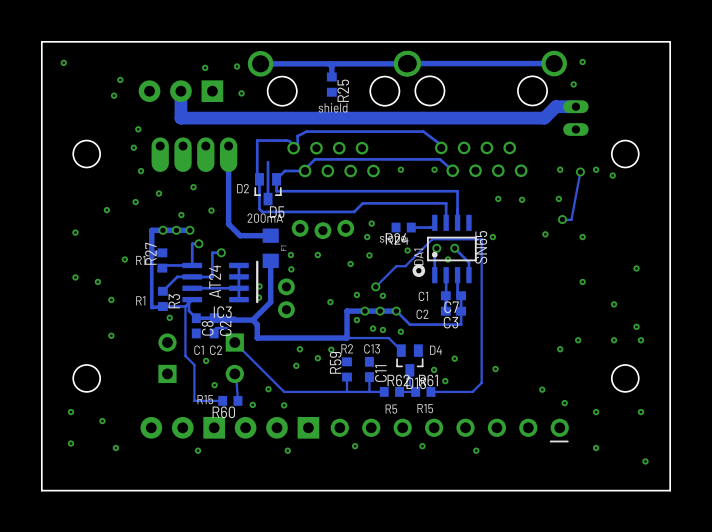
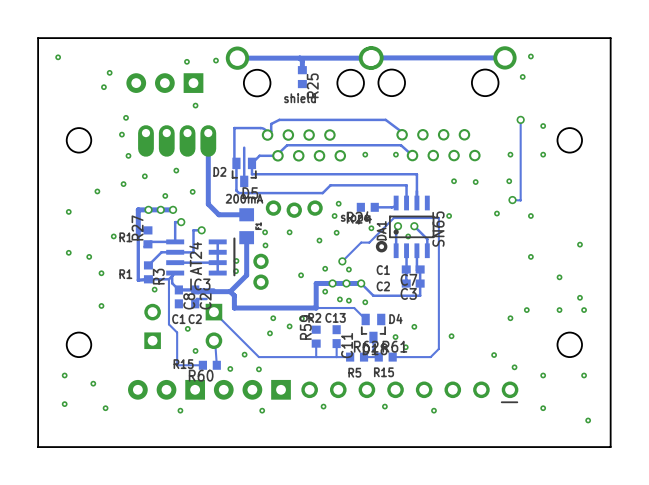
track: (180, 91) (180, 118) (544, 118) (555, 106) (575, 106) -> none
via position: (241, 93) -> (195, 105)
part: (575, 118) -> none
track: (580, 171) (571, 219) -> (520, 119) (520, 200)
via position: (580, 171) -> (520, 119)
via position: (612, 175) -> (543, 126)

